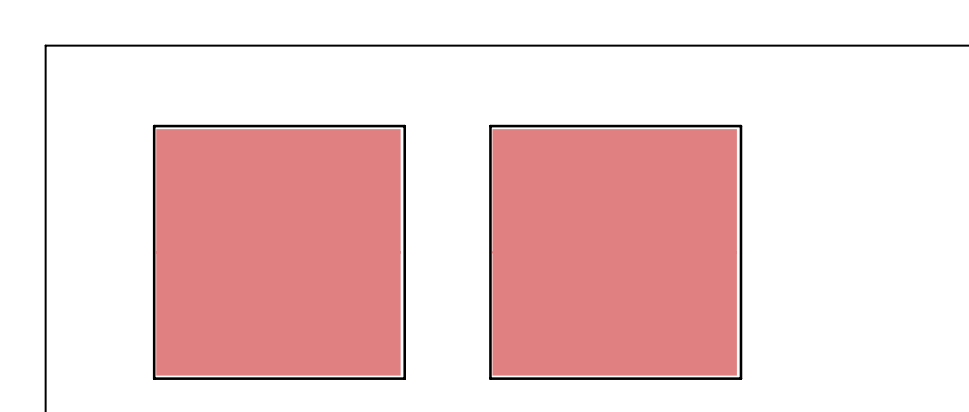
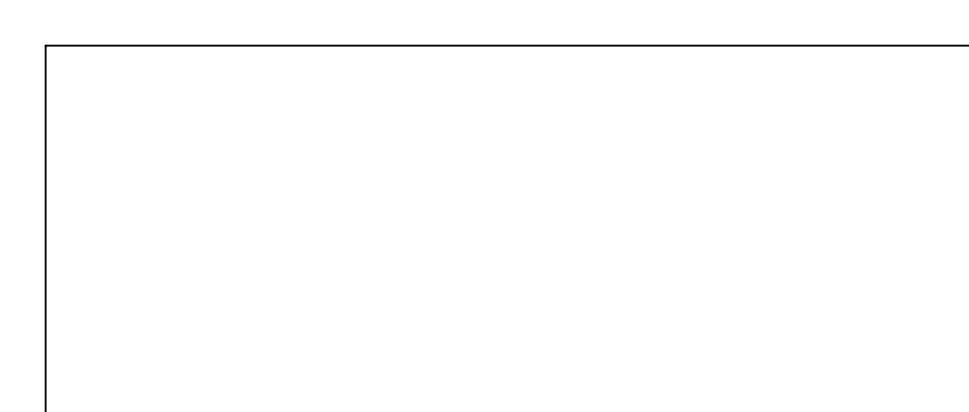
part: (279, 252) -> none
part: (615, 252) -> none

